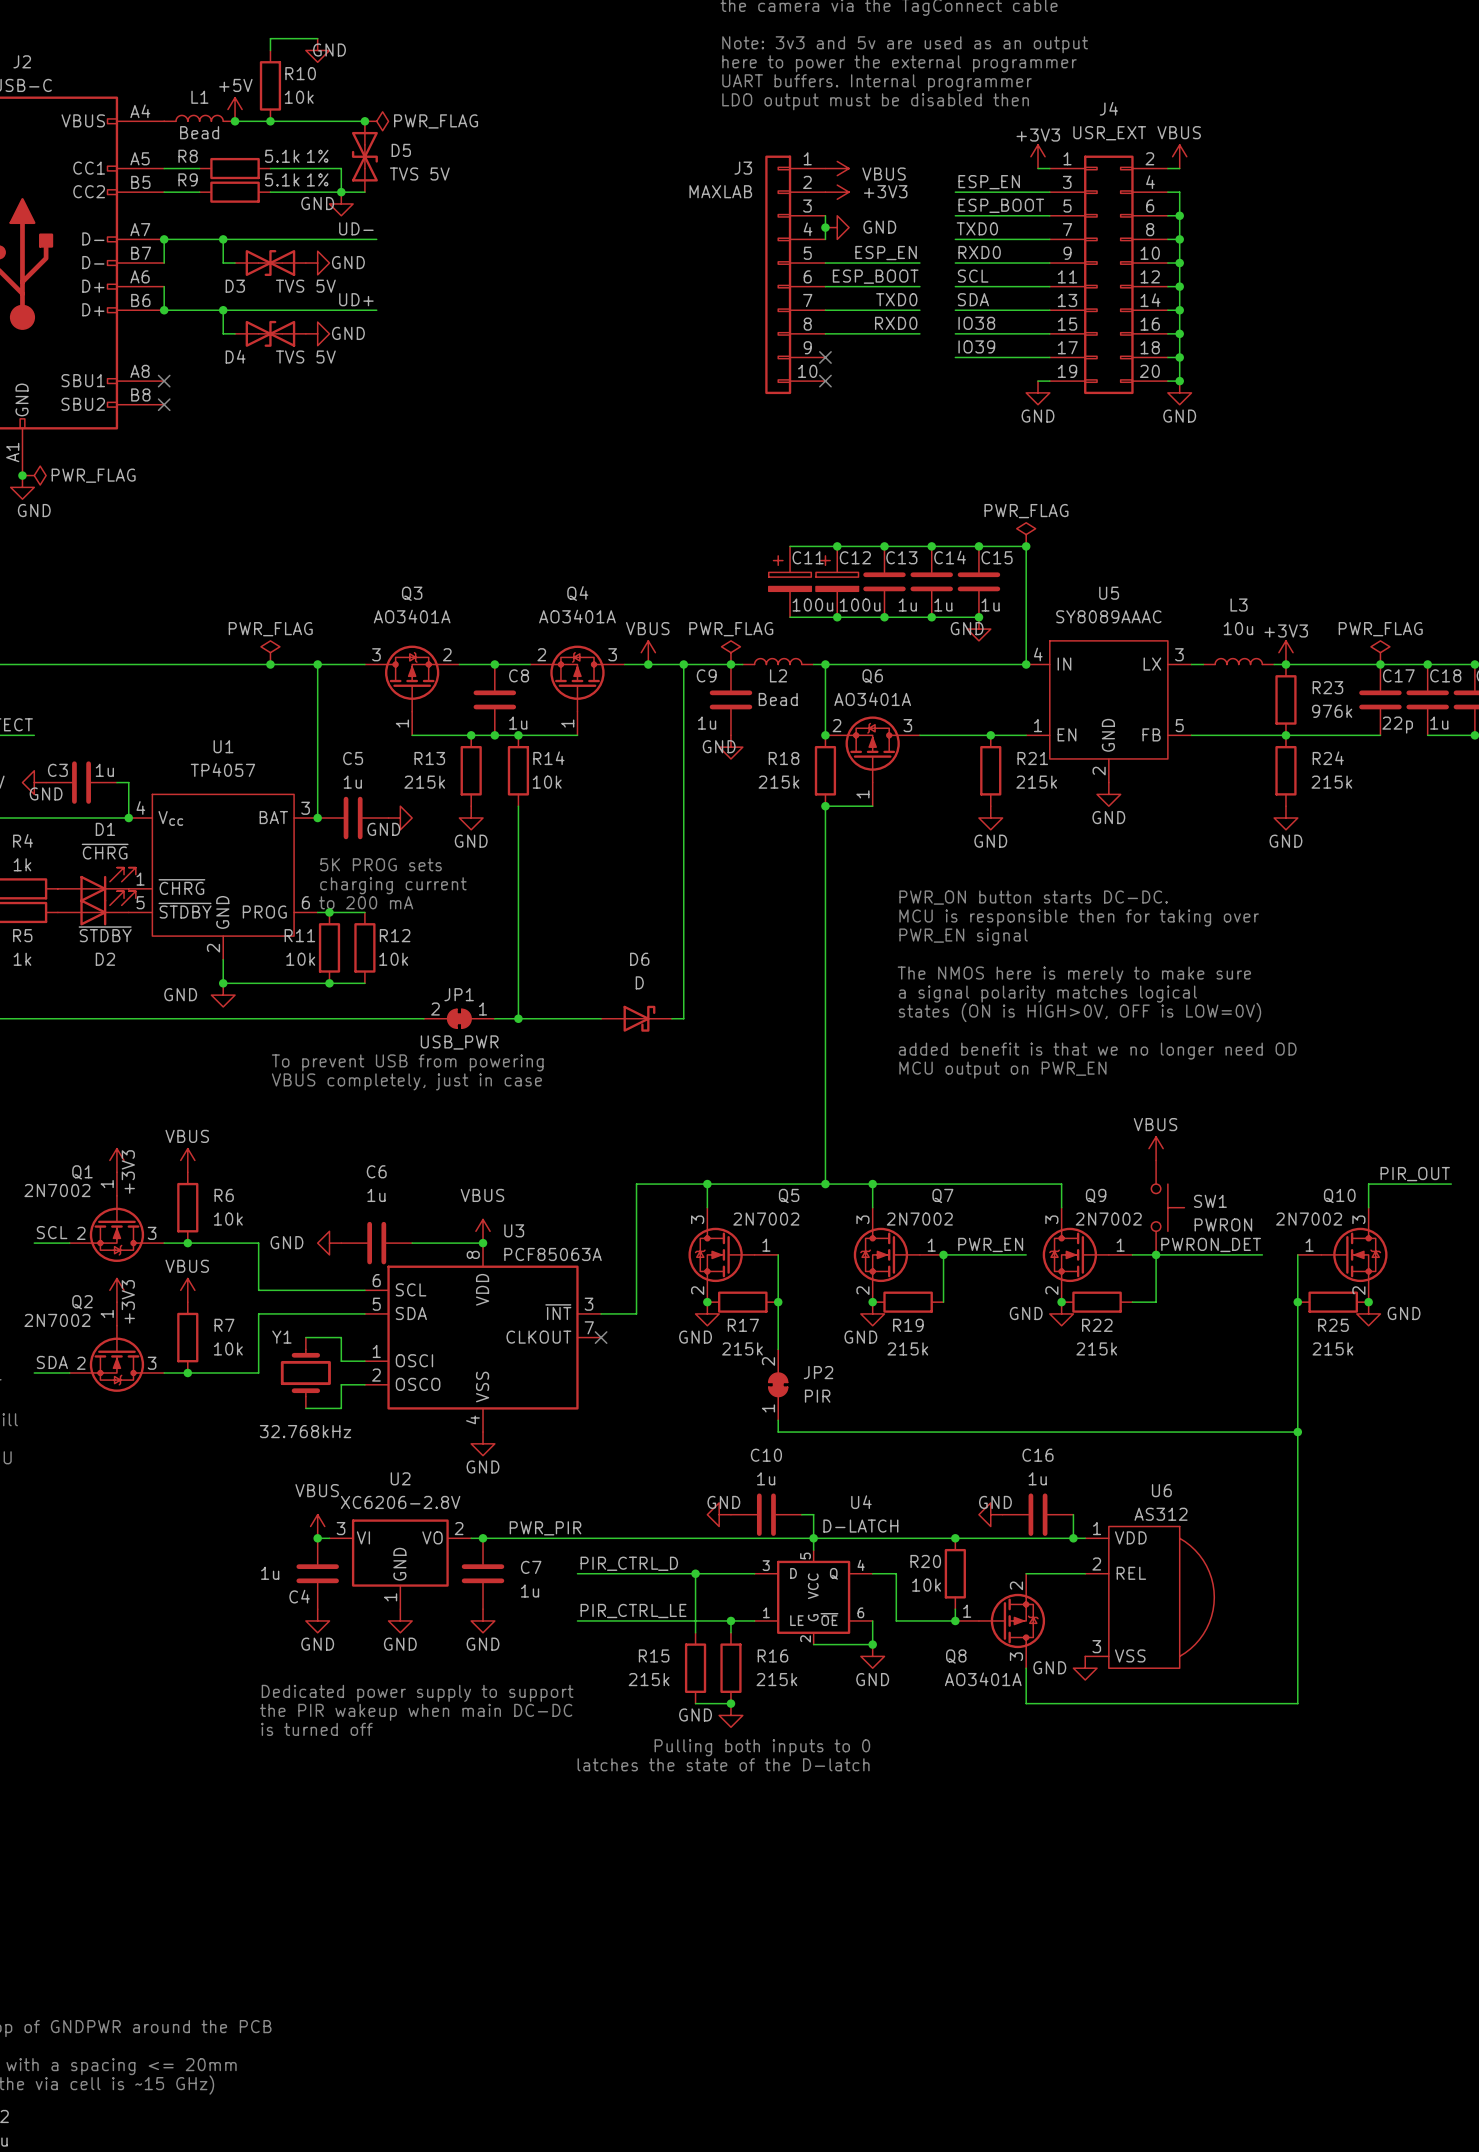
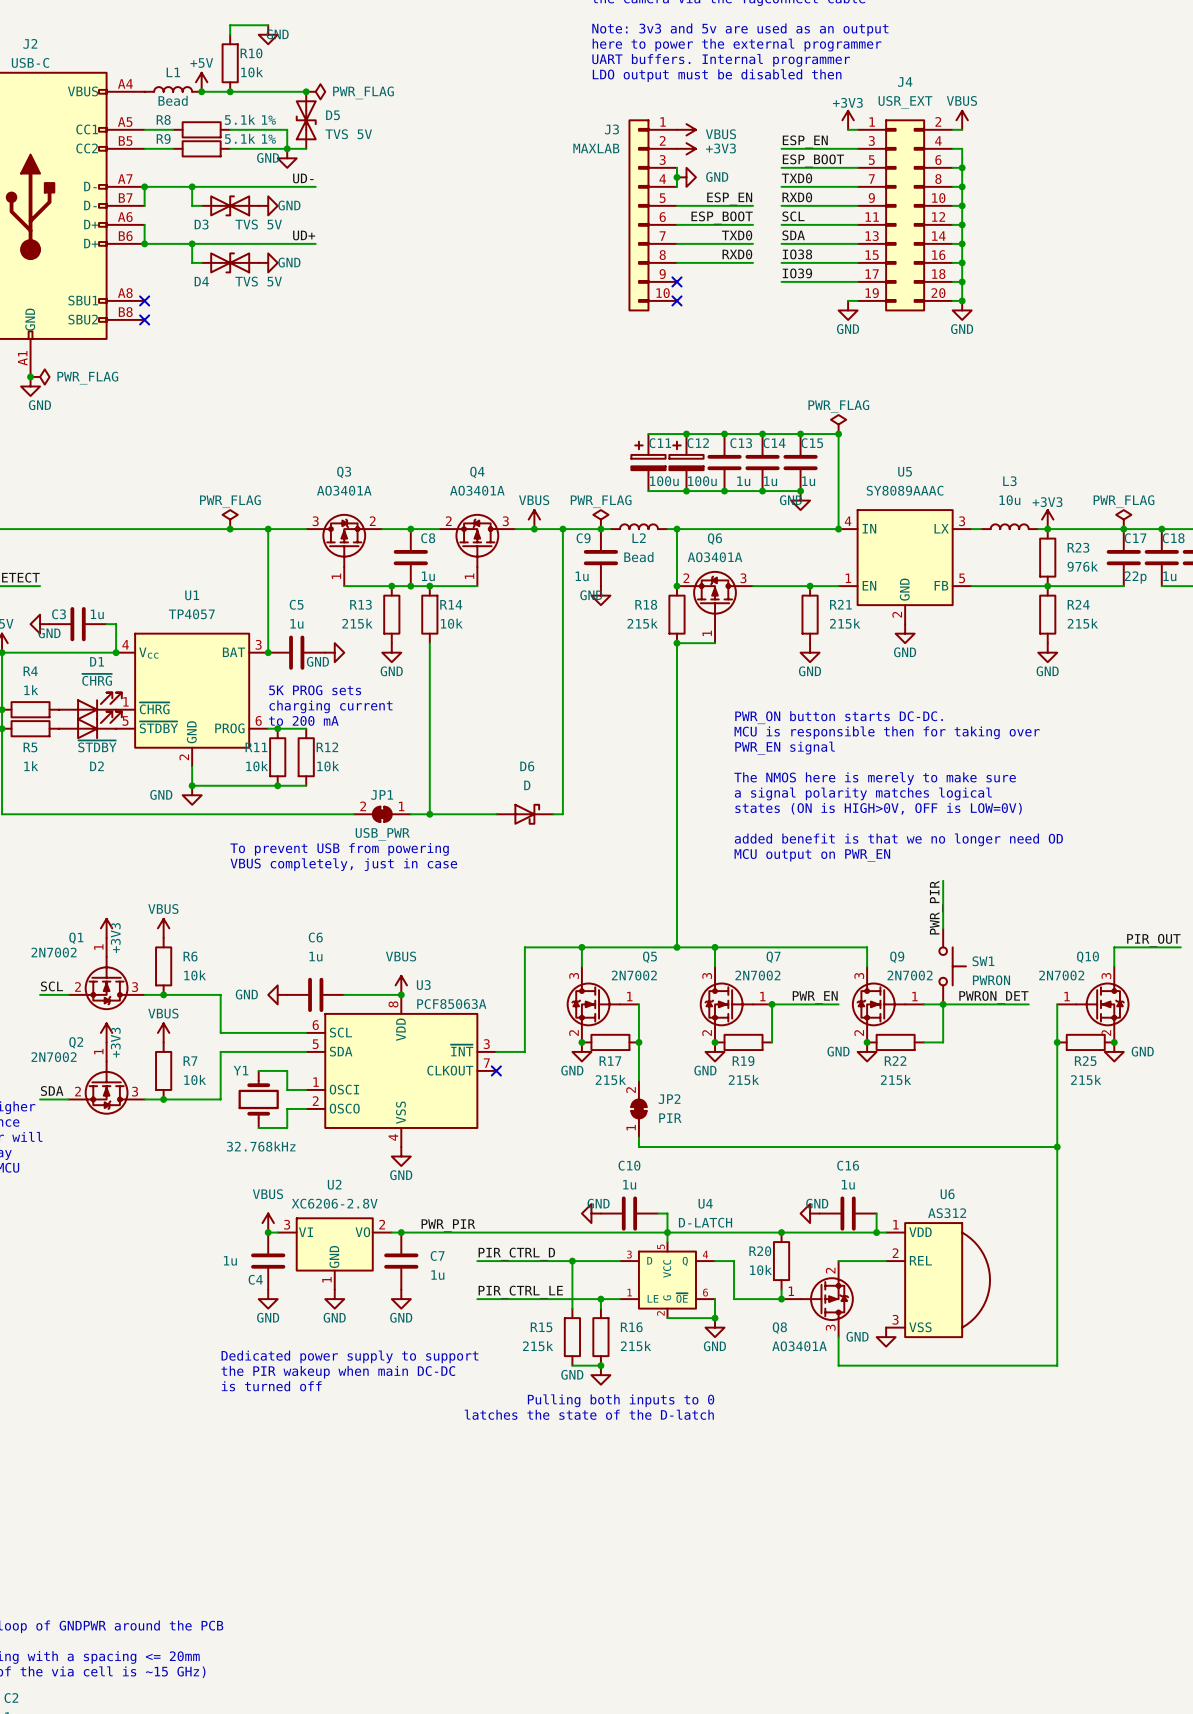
wire: none -> (943, 880) (943, 928)
label: none -> PWR_PIR (936, 907)
power symbol: VBUS (1156, 1148) -> none

